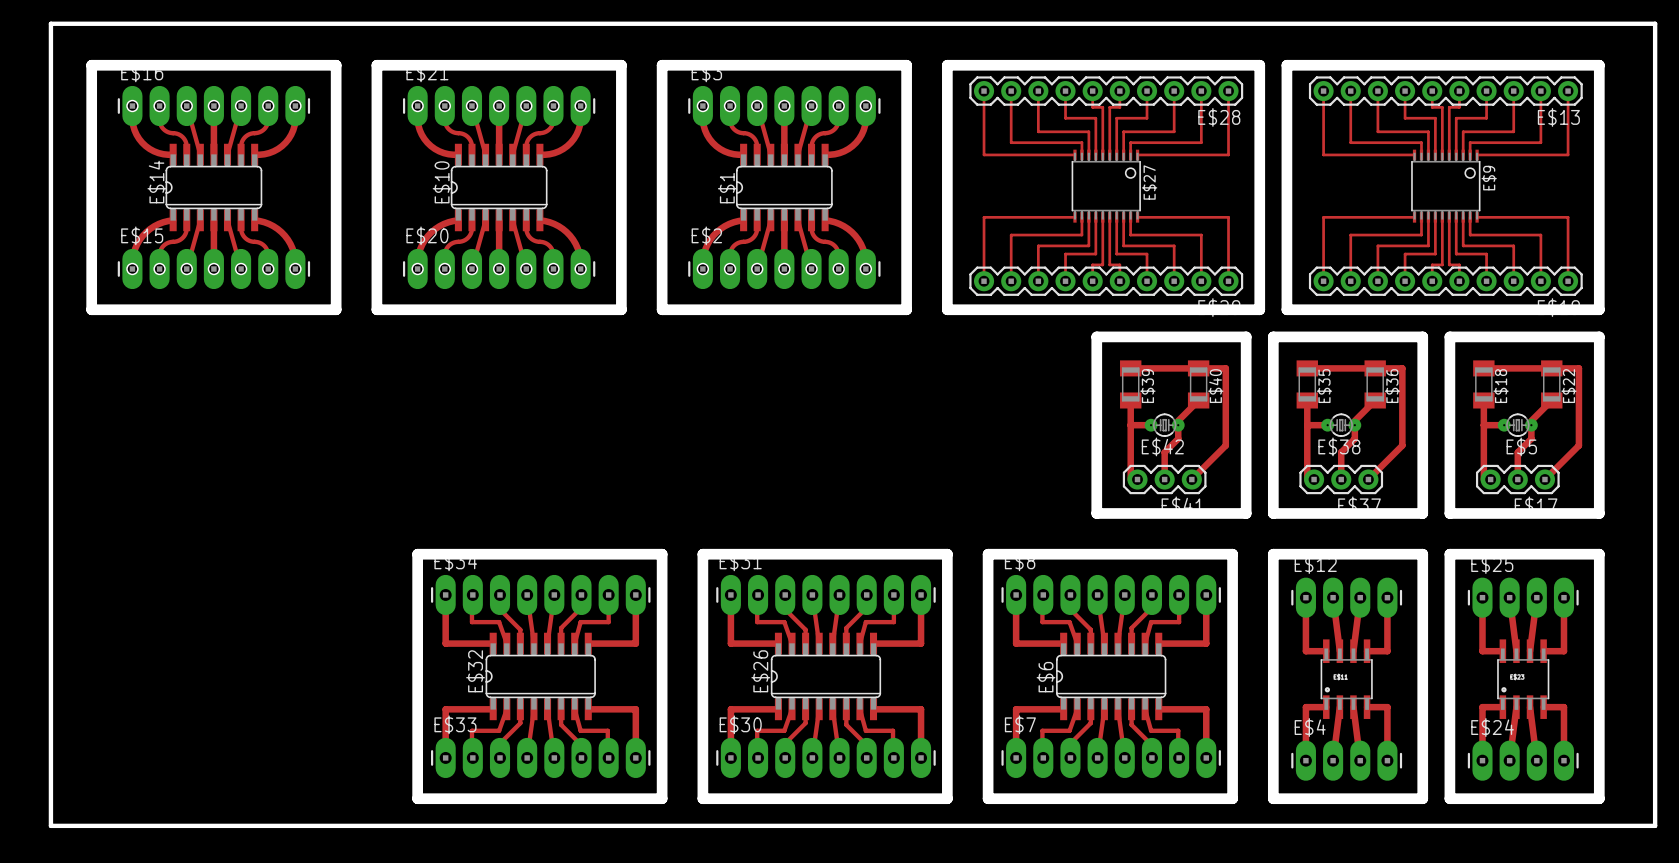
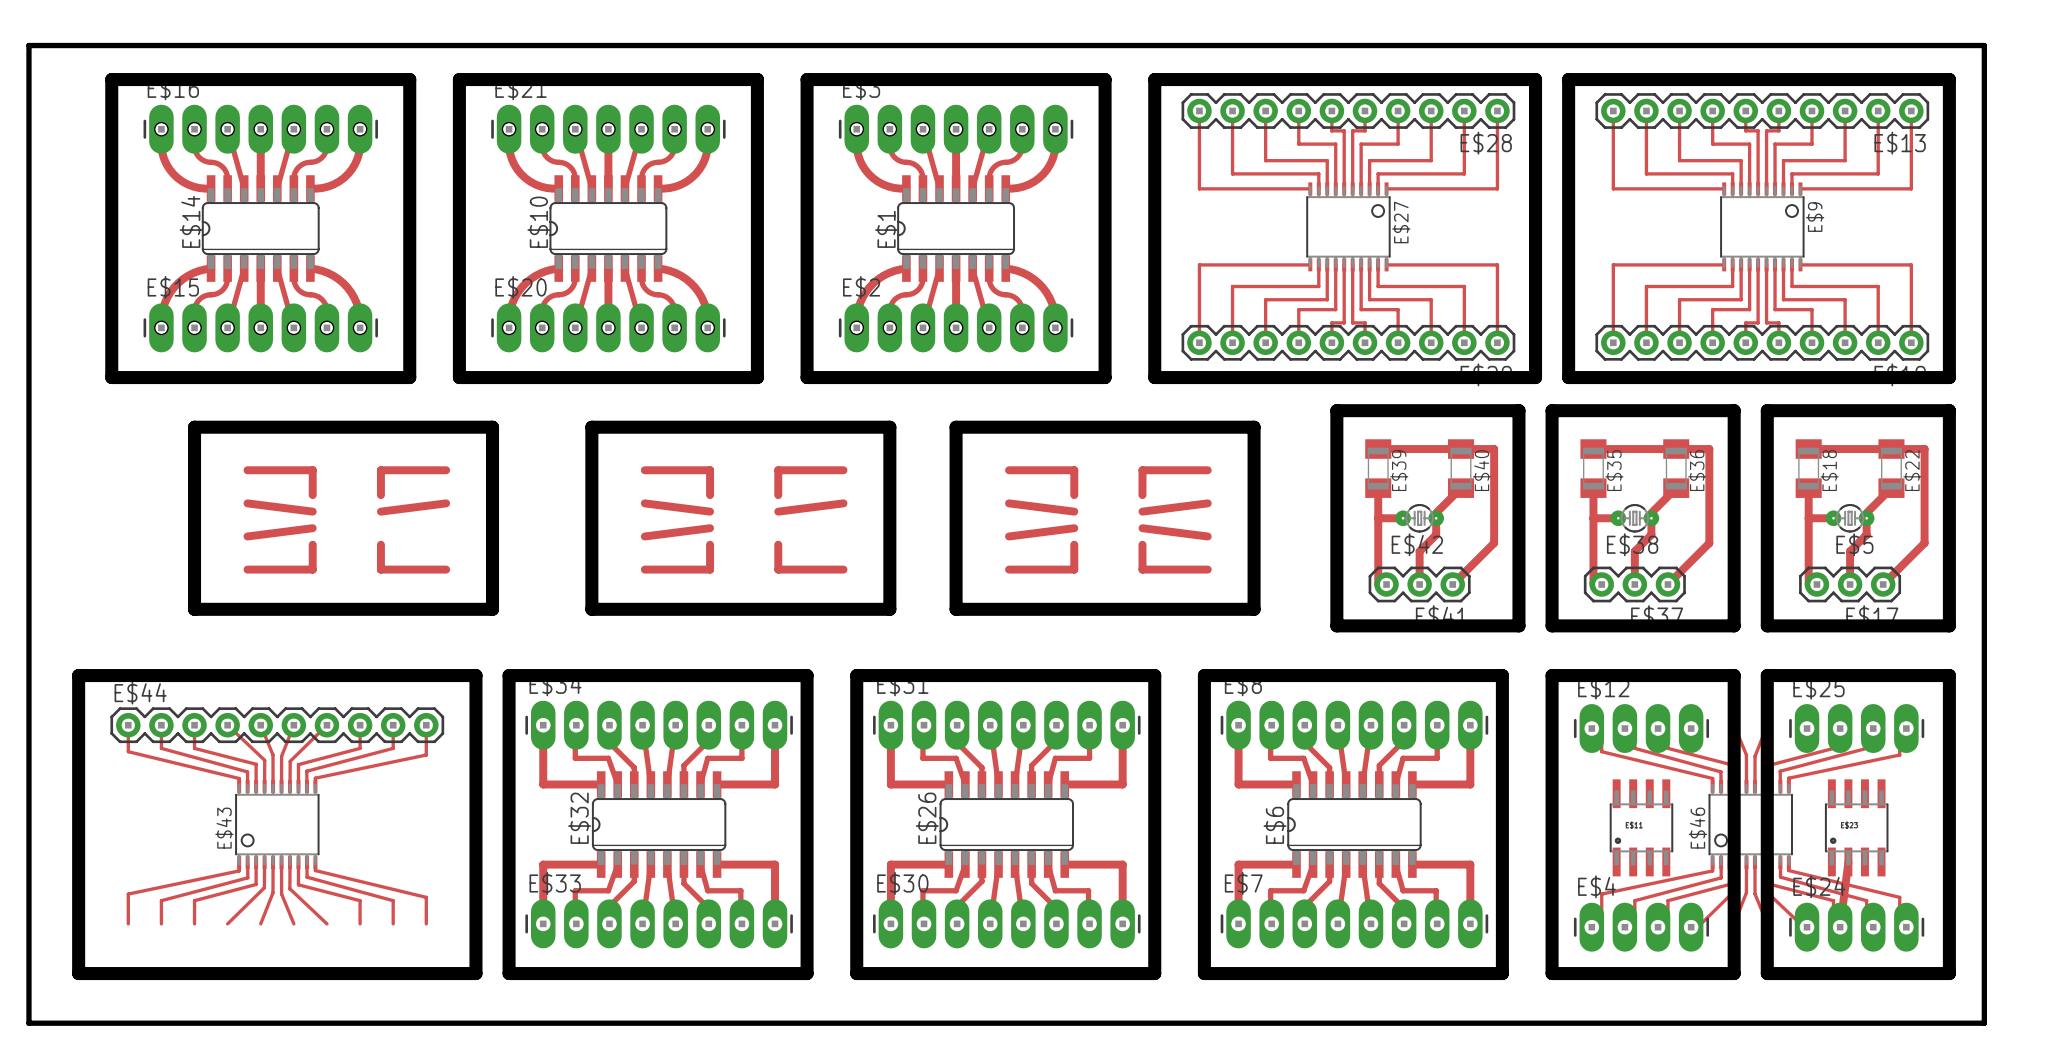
board edge: (50, 23) (1655, 23) (1655, 825) (50, 825) (50, 23) -> (28, 45) (1984, 45) (1984, 1023) (28, 1023) (28, 45)
board edge: none -> (194, 427) (492, 427) (492, 609) (194, 609) (194, 427)
board edge: none -> (591, 427) (889, 427) (889, 609) (591, 609) (591, 427)
board edge: none -> (956, 427) (1254, 427) (1254, 609) (956, 609) (956, 427)
track: none -> (247, 470) (312, 470) (312, 495)
track: none -> (446, 470) (380, 470) (380, 495)
track: none -> (644, 470) (710, 470) (710, 495)
track: none -> (843, 470) (778, 470) (778, 495)
track: none -> (1009, 470) (1074, 470) (1074, 495)
track: none -> (1207, 470) (1142, 470) (1142, 495)
track: none -> (247, 503) (312, 511)
track: none -> (446, 503) (380, 511)
track: none -> (644, 503) (710, 511)
track: none -> (843, 503) (778, 511)
track: none -> (1009, 503) (1074, 511)
track: none -> (1207, 503) (1142, 511)
track: none -> (312, 528) (247, 536)
track: none -> (710, 528) (644, 536)
track: none -> (1074, 528) (1009, 536)
track: none -> (1142, 528) (1207, 536)
track: none -> (312, 544) (312, 569) (247, 569)
track: none -> (380, 544) (380, 569) (446, 569)
track: none -> (710, 544) (710, 569) (644, 569)
track: none -> (778, 544) (778, 569) (843, 569)
track: none -> (1074, 544) (1074, 569) (1009, 569)
track: none -> (1142, 544) (1142, 569) (1207, 569)
board edge: none -> (78, 675) (475, 675) (475, 973) (78, 973) (78, 675)
track: none -> (128, 725) (128, 751) (239, 778) (239, 786)
track: none -> (161, 725) (161, 748) (247, 771) (247, 786)
track: none -> (194, 725) (194, 748) (256, 764) (256, 786)
track: none -> (227, 725) (264, 760) (264, 786)
track: none -> (260, 725) (273, 755) (273, 786)
E$44: none -> (277, 725)
track: none -> (293, 725) (281, 756) (281, 786)
track: none -> (326, 725) (290, 761) (290, 786)
track: none -> (360, 725) (360, 748) (298, 764) (298, 786)
track: none -> (393, 725) (393, 748) (306, 771) (306, 786)
track: none -> (426, 725) (426, 755) (315, 778) (315, 786)
track: none -> (1601, 725) (1601, 751) (1712, 778) (1712, 786)
track: none -> (1634, 725) (1634, 748) (1720, 771) (1721, 786)
track: none -> (1667, 725) (1667, 748) (1729, 764) (1729, 786)
track: none -> (1734, 725) (1746, 755) (1746, 786)
track: none -> (1767, 725) (1755, 756) (1754, 786)
track: none -> (1833, 725) (1833, 748) (1771, 764) (1771, 786)
track: none -> (1866, 725) (1866, 748) (1780, 771) (1780, 786)
track: none -> (1899, 725) (1899, 755) (1788, 778) (1788, 786)
track: (1305, 597) (1305, 651) (1326, 651) -> none
track: (1333, 597) (1339, 651) -> none
track: (1360, 597) (1353, 651) -> none
track: (1387, 597) (1387, 651) (1367, 651) -> none
track: (1482, 597) (1482, 651) (1502, 651) -> none
track: (1509, 597) (1516, 651) -> none
track: (1536, 597) (1530, 651) -> none
track: (1563, 597) (1563, 651) (1543, 651) -> none
E$43: none -> (277, 824)
E$46: none -> (1750, 824)
track: none -> (239, 862) (239, 870) (128, 894) (128, 923)
track: none -> (247, 862) (247, 877) (161, 900) (161, 923)
track: none -> (256, 862) (256, 884) (194, 900) (194, 923)
track: none -> (264, 862) (264, 887) (227, 923)
track: none -> (273, 862) (273, 892) (260, 923)
track: none -> (281, 862) (281, 894) (293, 923)
track: none -> (290, 862) (289, 888) (326, 923)
track: none -> (298, 862) (298, 884) (360, 900) (360, 923)
track: none -> (306, 862) (307, 877) (393, 900) (393, 923)
track: none -> (315, 862) (315, 870) (426, 897) (426, 923)
track: (1326, 707) (1305, 707) (1305, 760) -> none
track: (1339, 707) (1333, 760) -> none
track: (1353, 707) (1360, 760) -> none
track: (1367, 707) (1387, 707) (1387, 760) -> none
track: none -> (1712, 862) (1712, 870) (1601, 894) (1601, 923)
track: none -> (1721, 862) (1721, 877) (1634, 900) (1634, 923)
track: none -> (1729, 862) (1729, 884) (1667, 900) (1667, 923)
track: none -> (1738, 862) (1737, 887) (1701, 923)
track: none -> (1746, 862) (1746, 892) (1734, 923)
track: none -> (1754, 862) (1755, 894) (1767, 923)
track: none -> (1763, 862) (1763, 888) (1800, 923)
track: none -> (1771, 862) (1771, 884) (1833, 900) (1833, 923)
track: none -> (1780, 862) (1780, 877) (1866, 900) (1866, 923)
track: none -> (1788, 862) (1788, 870) (1899, 897) (1899, 923)
track: (1502, 707) (1482, 707) (1482, 760) -> none
track: (1530, 707) (1536, 760) -> none
track: (1543, 707) (1563, 707) (1563, 760) -> none

